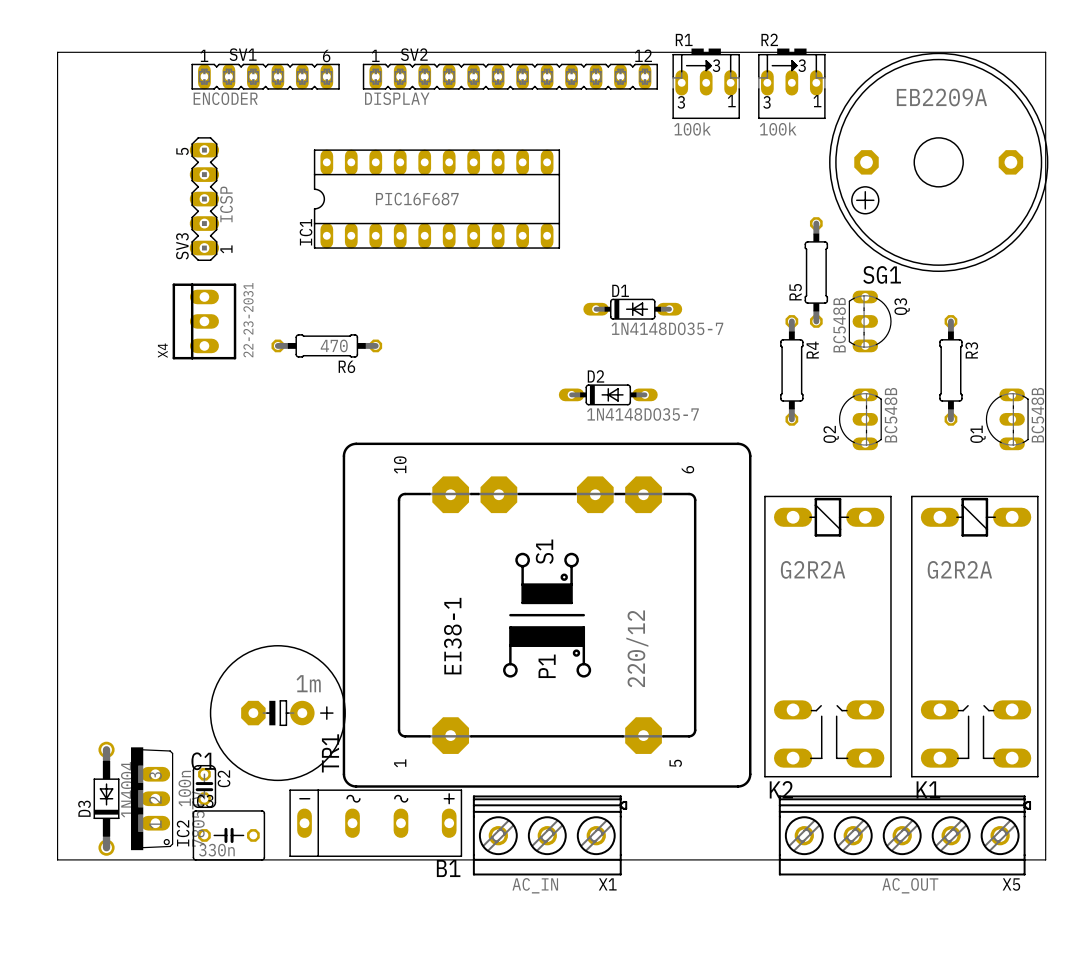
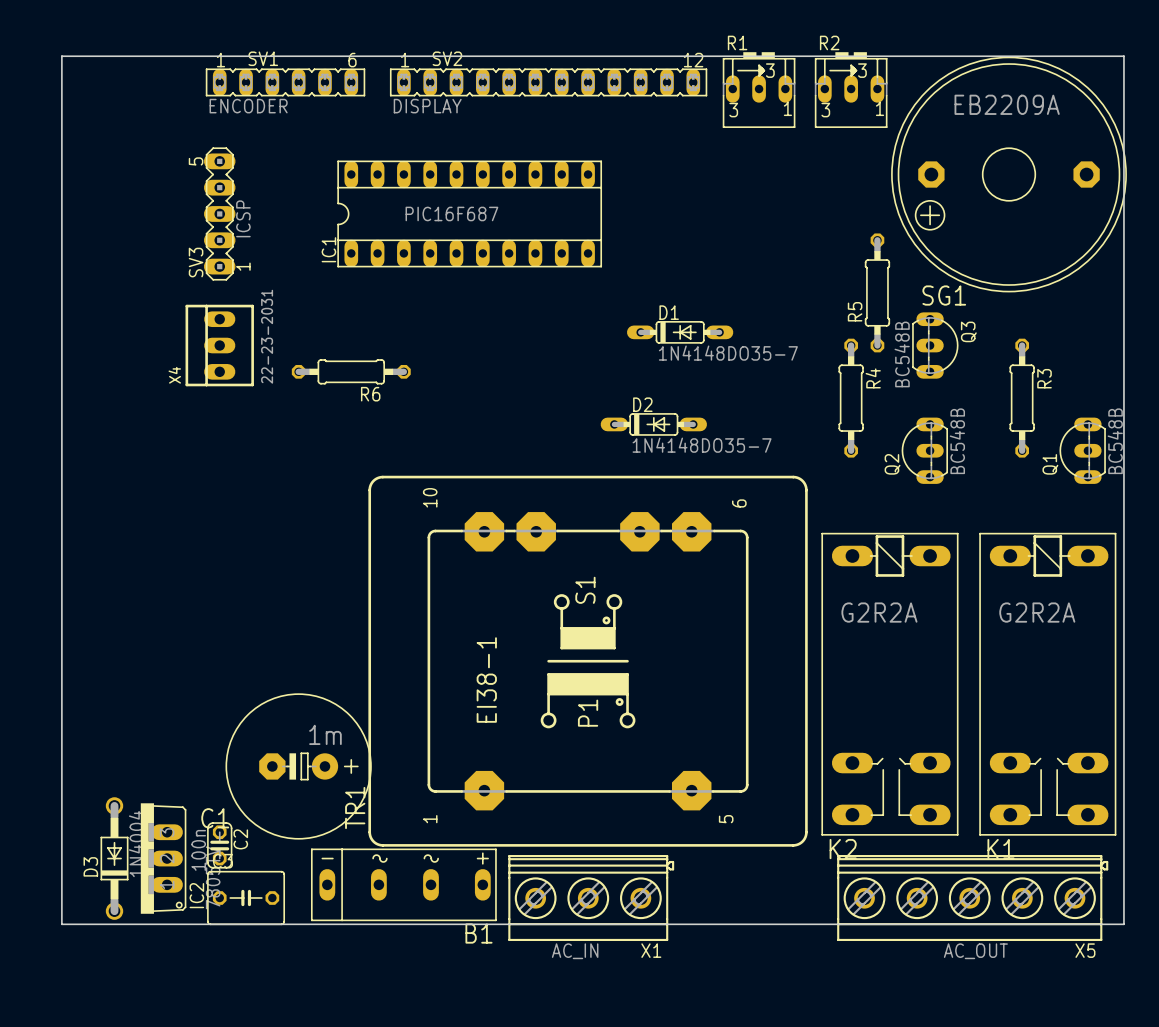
R1 value: 100k (692, 129) -> none
R2 value: 100k (778, 129) -> none
R6 value: 470 (334, 345) -> none
TR1 value: 220/12 (637, 648) -> none
C3 value: 330n (216, 850) -> none

